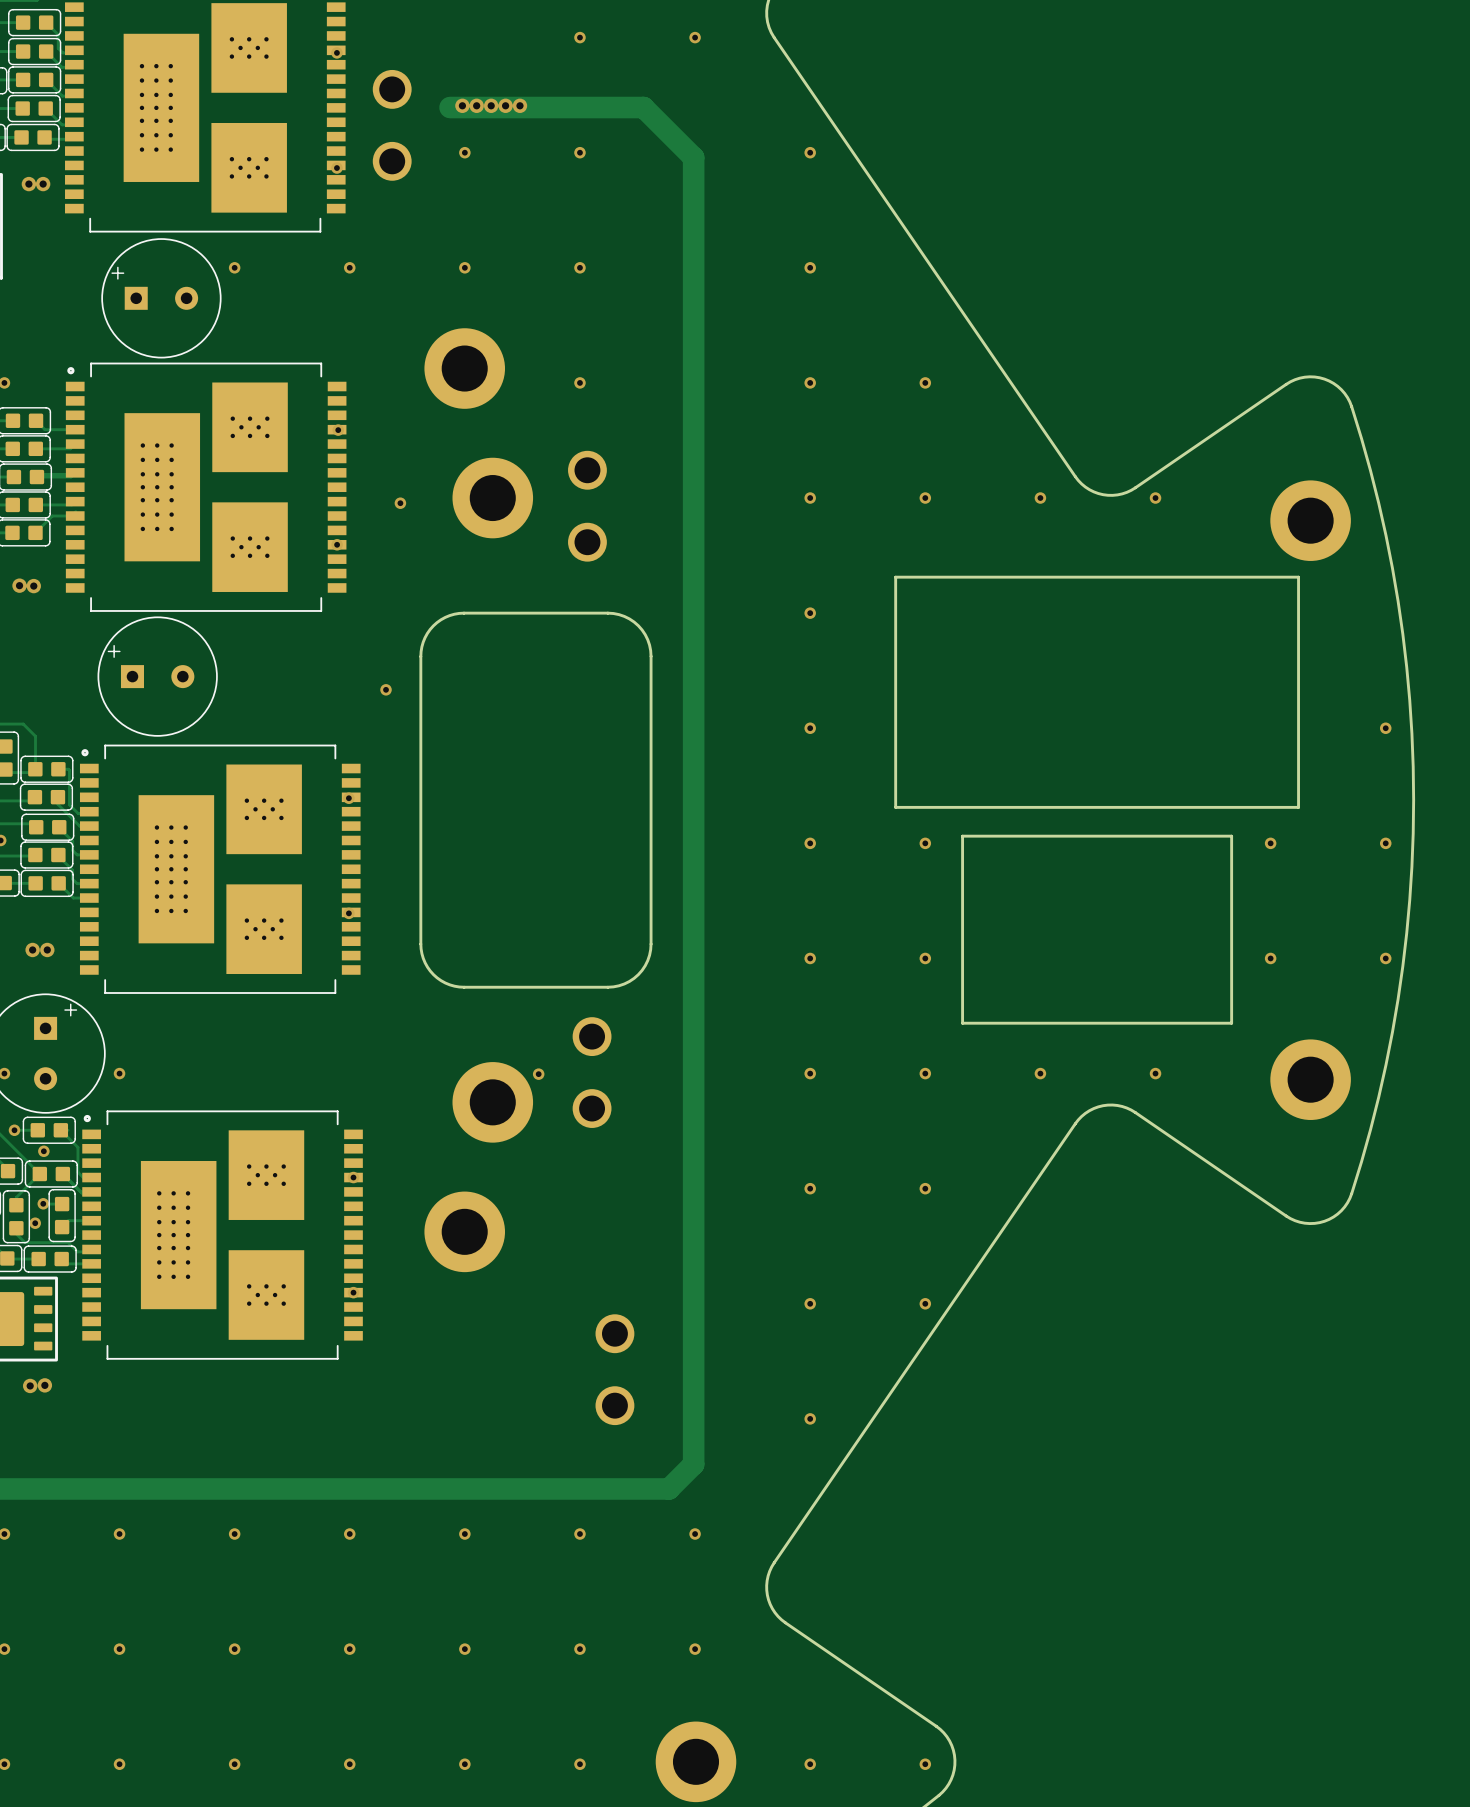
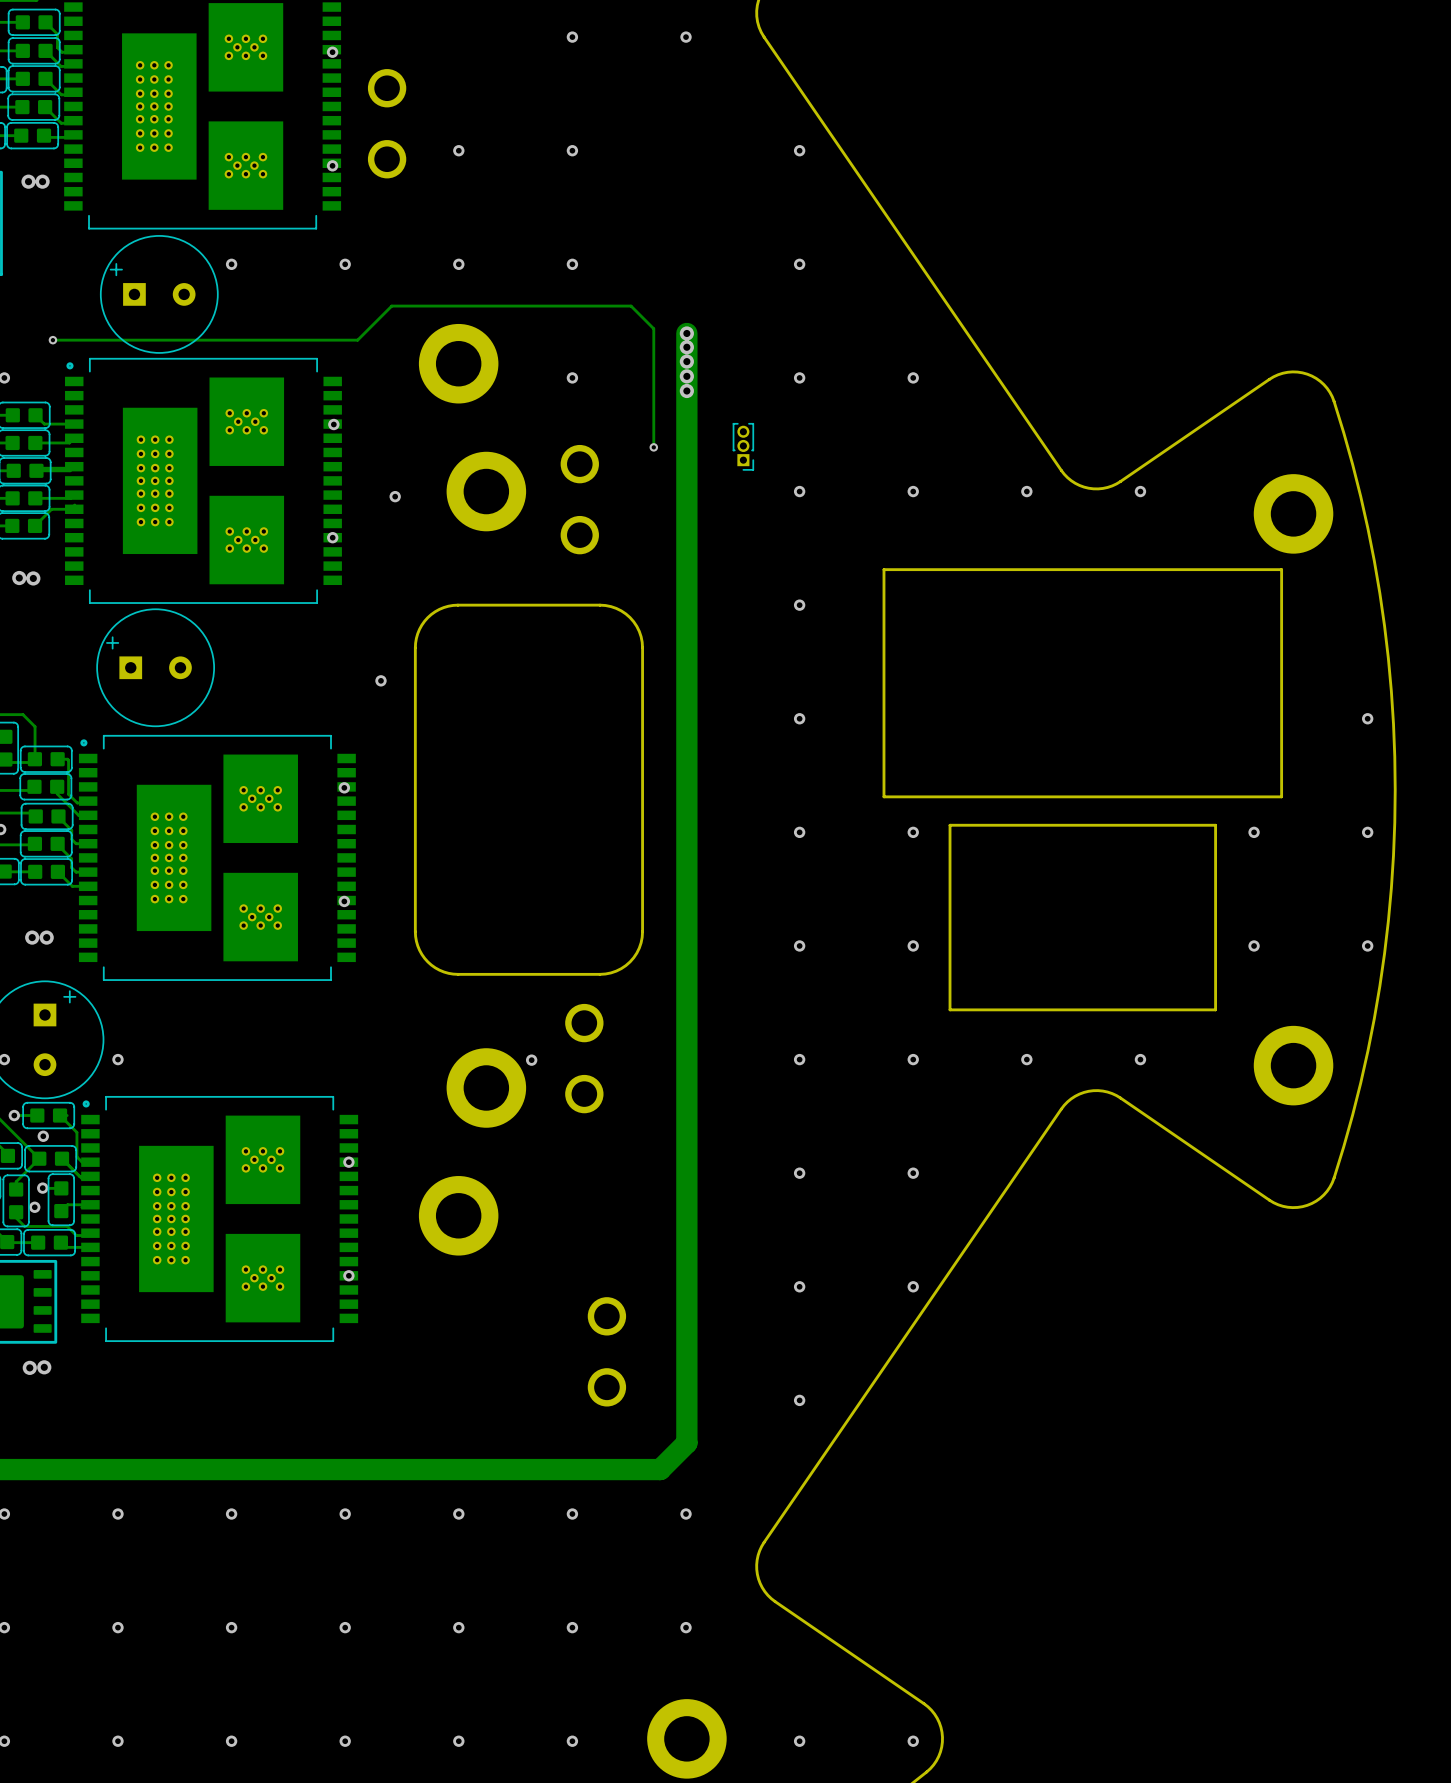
via: (462, 105) -> none
via: (476, 105) -> none
via: (491, 105) -> none
via: (505, 105) -> none
via: (519, 105) -> none
track: (450, 107) (643, 107) (693, 157) (693, 1464) -> (686, 333) (686, 1443) (684, 1445)
via: none -> (686, 333)
track: none -> (52, 340) (357, 340) (391, 306) (631, 306) (653, 328) (653, 447)
via: none -> (52, 340)
via: none -> (686, 347)
via: none -> (686, 361)
via: none -> (686, 376)
via: none -> (686, 390)
part: none -> (743, 446)
via: none -> (653, 447)

